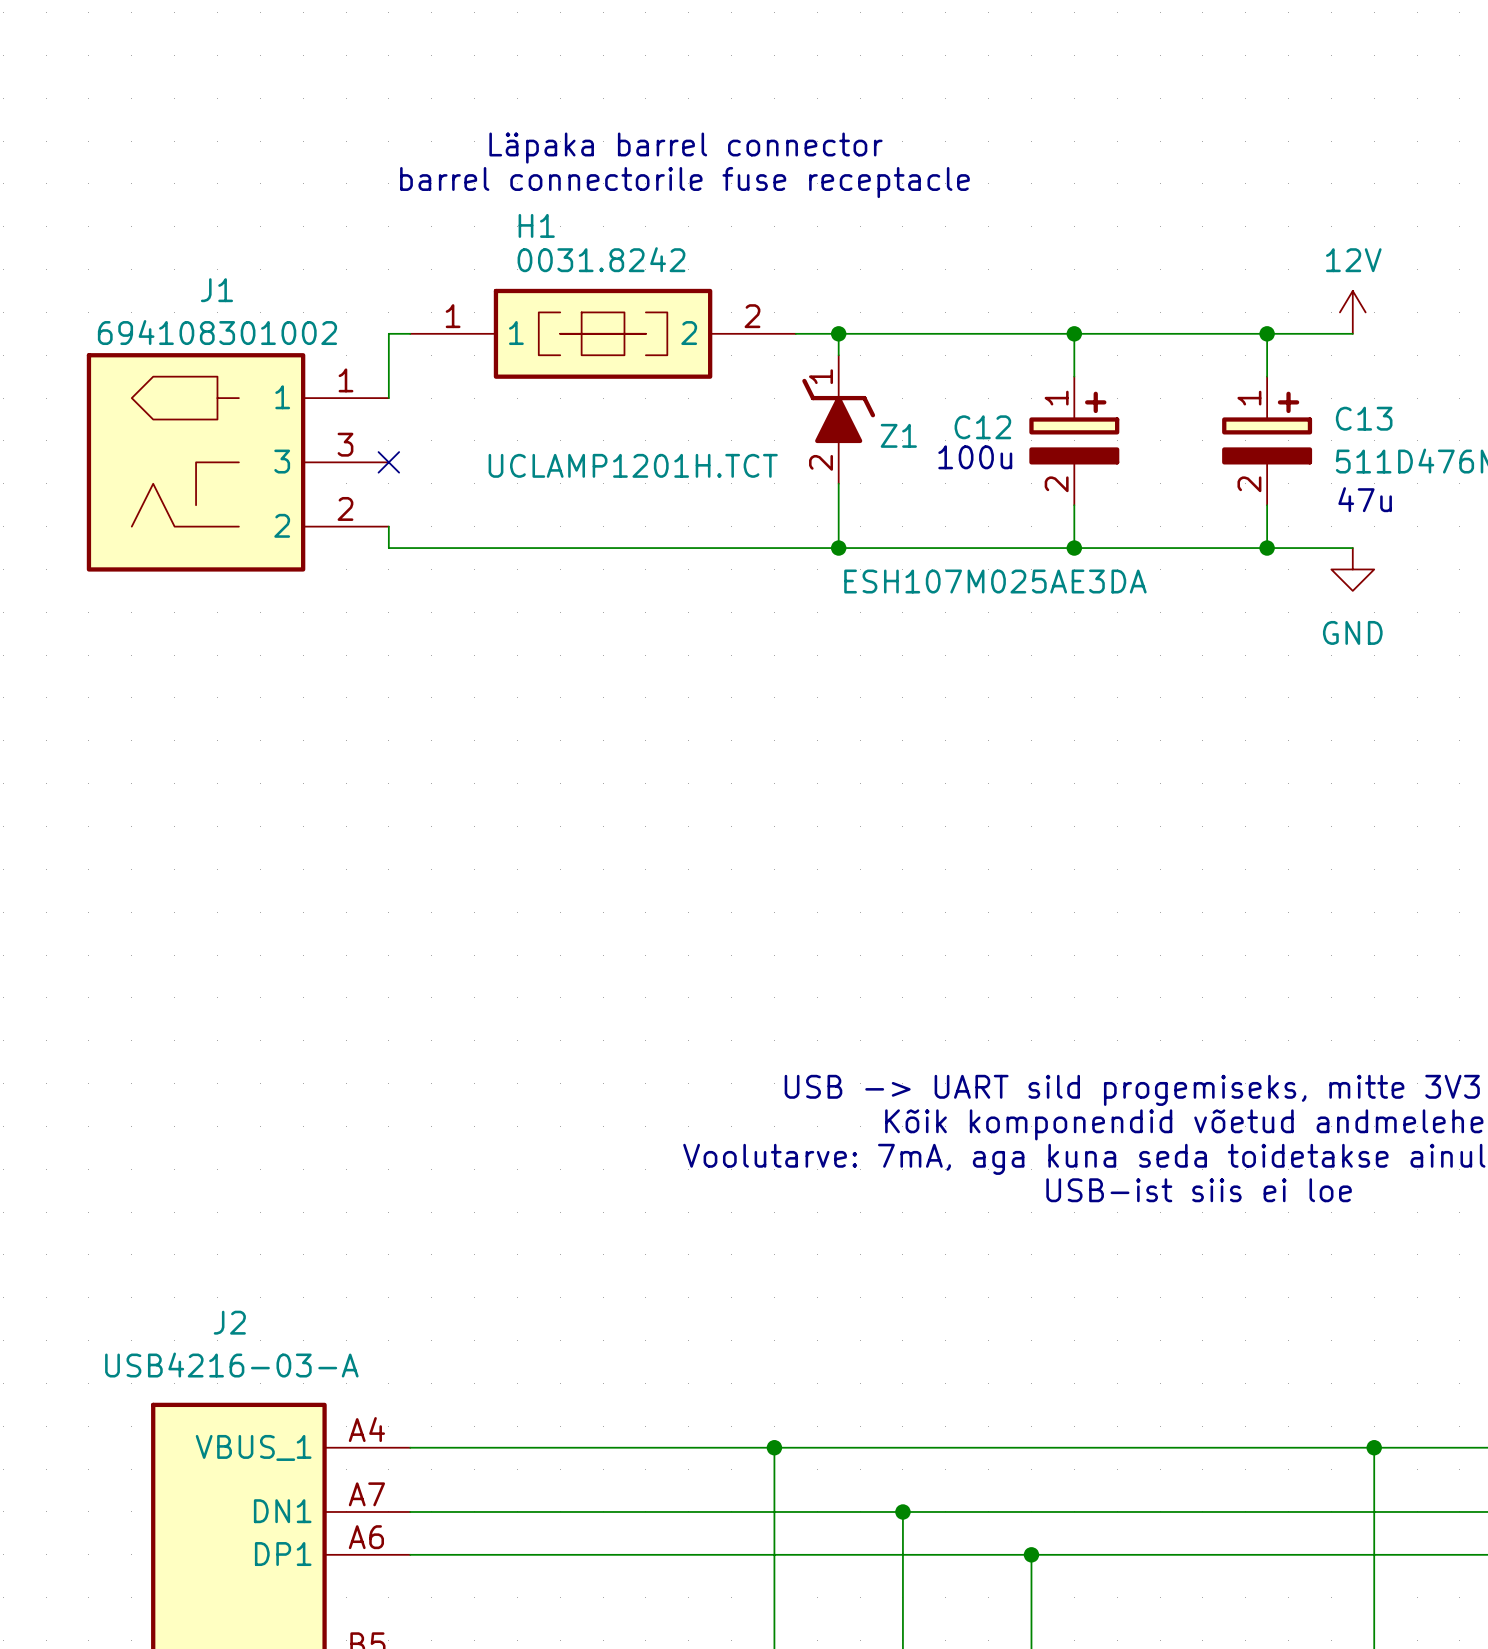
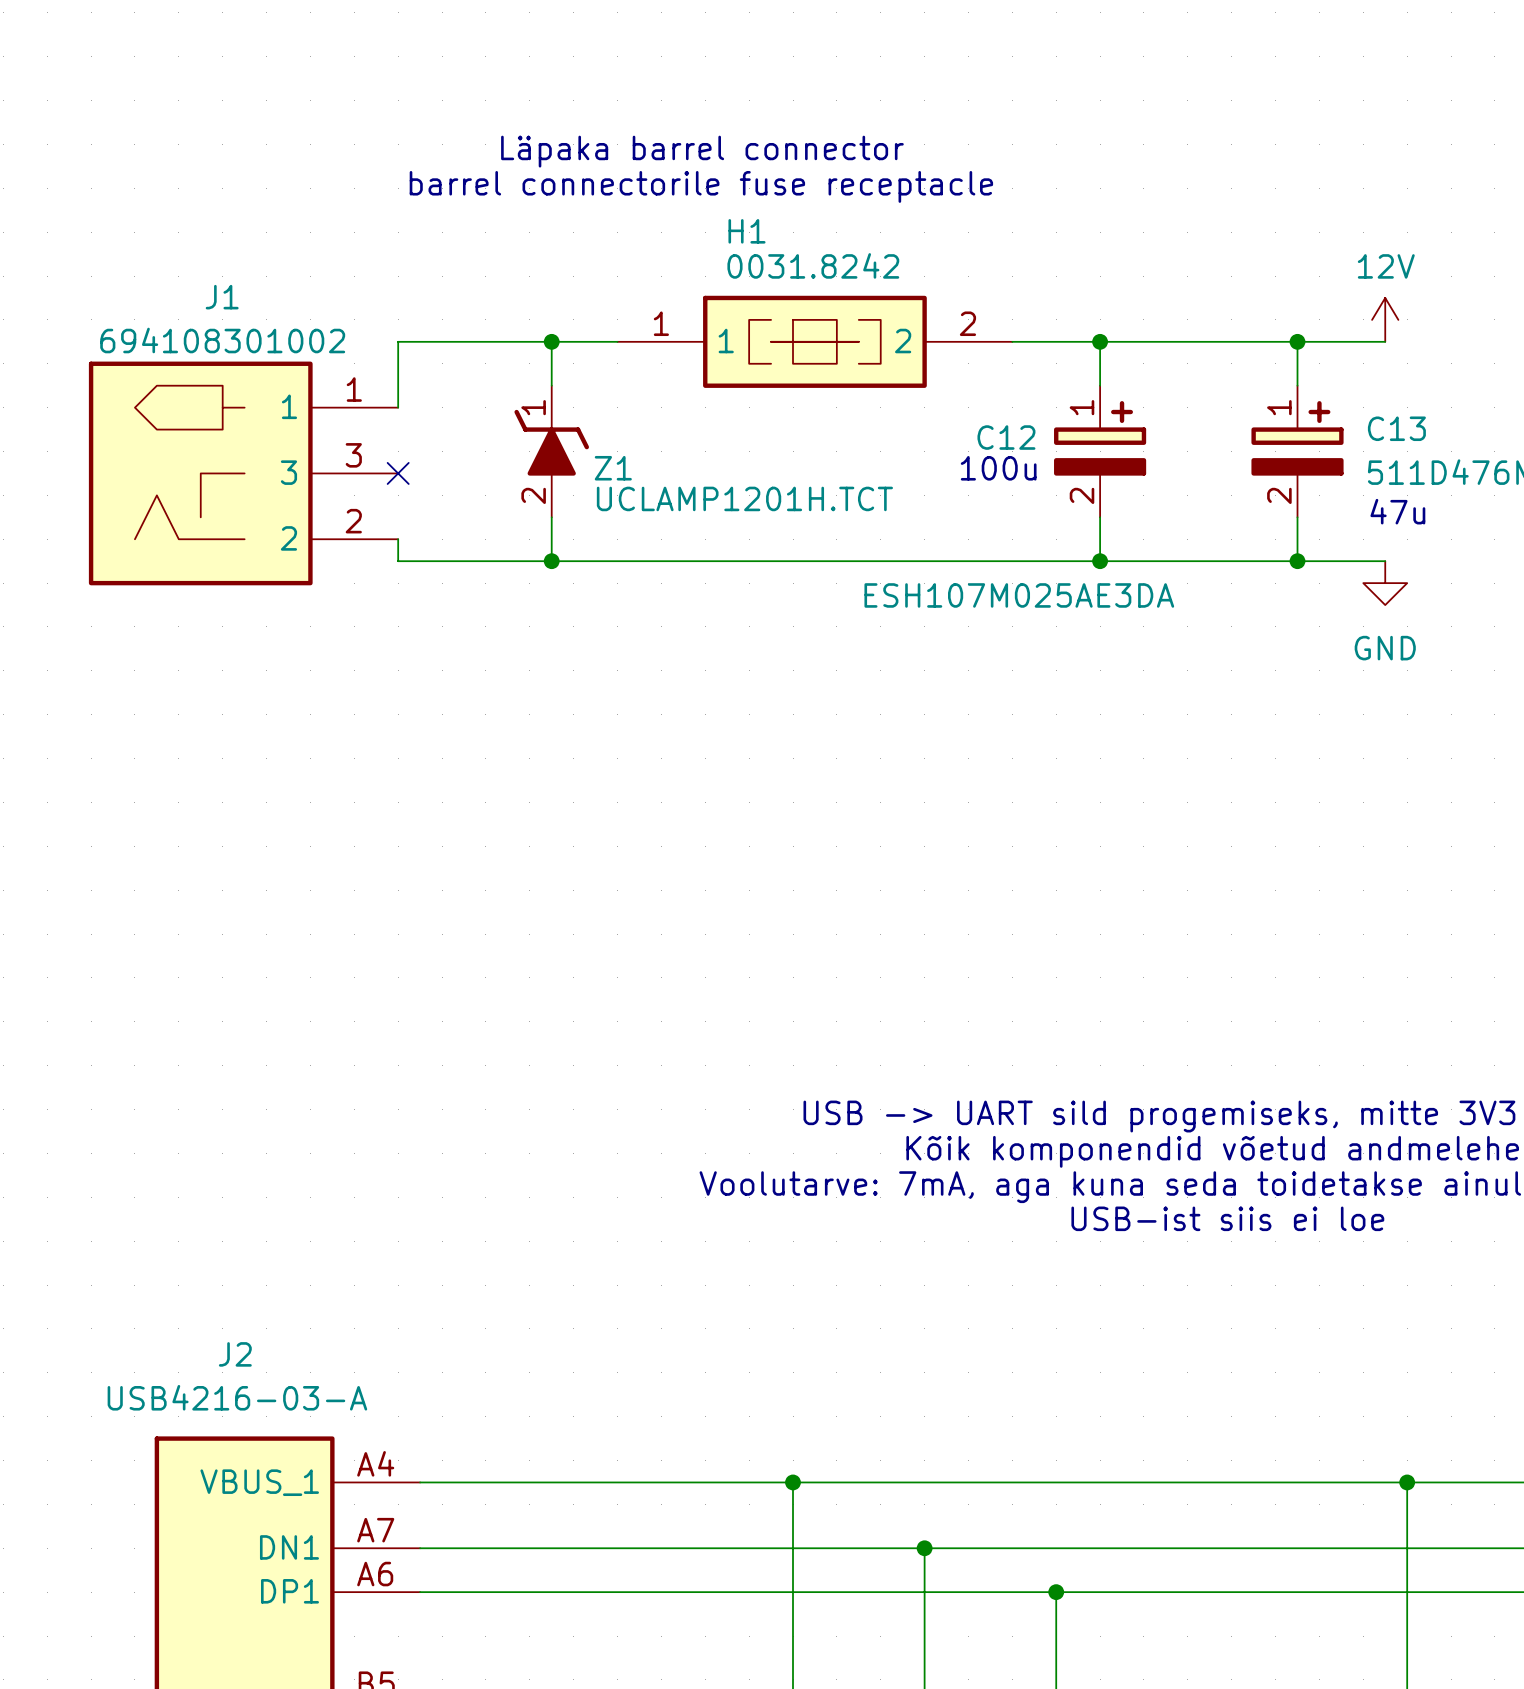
junction: none -> (551, 341)
H1 position: (603, 333) -> (814, 341)
junction: (838, 333) -> none
Z1 position: (838, 419) -> (551, 451)
Z1 value position: UCLAMP1201H.TCT (633, 465) -> UCLAMP1201H.TCT (744, 498)
wire: (838, 483) (838, 548) -> none
wire: none -> (551, 517) (551, 561)
junction: none -> (551, 561)
junction: (838, 548) -> none

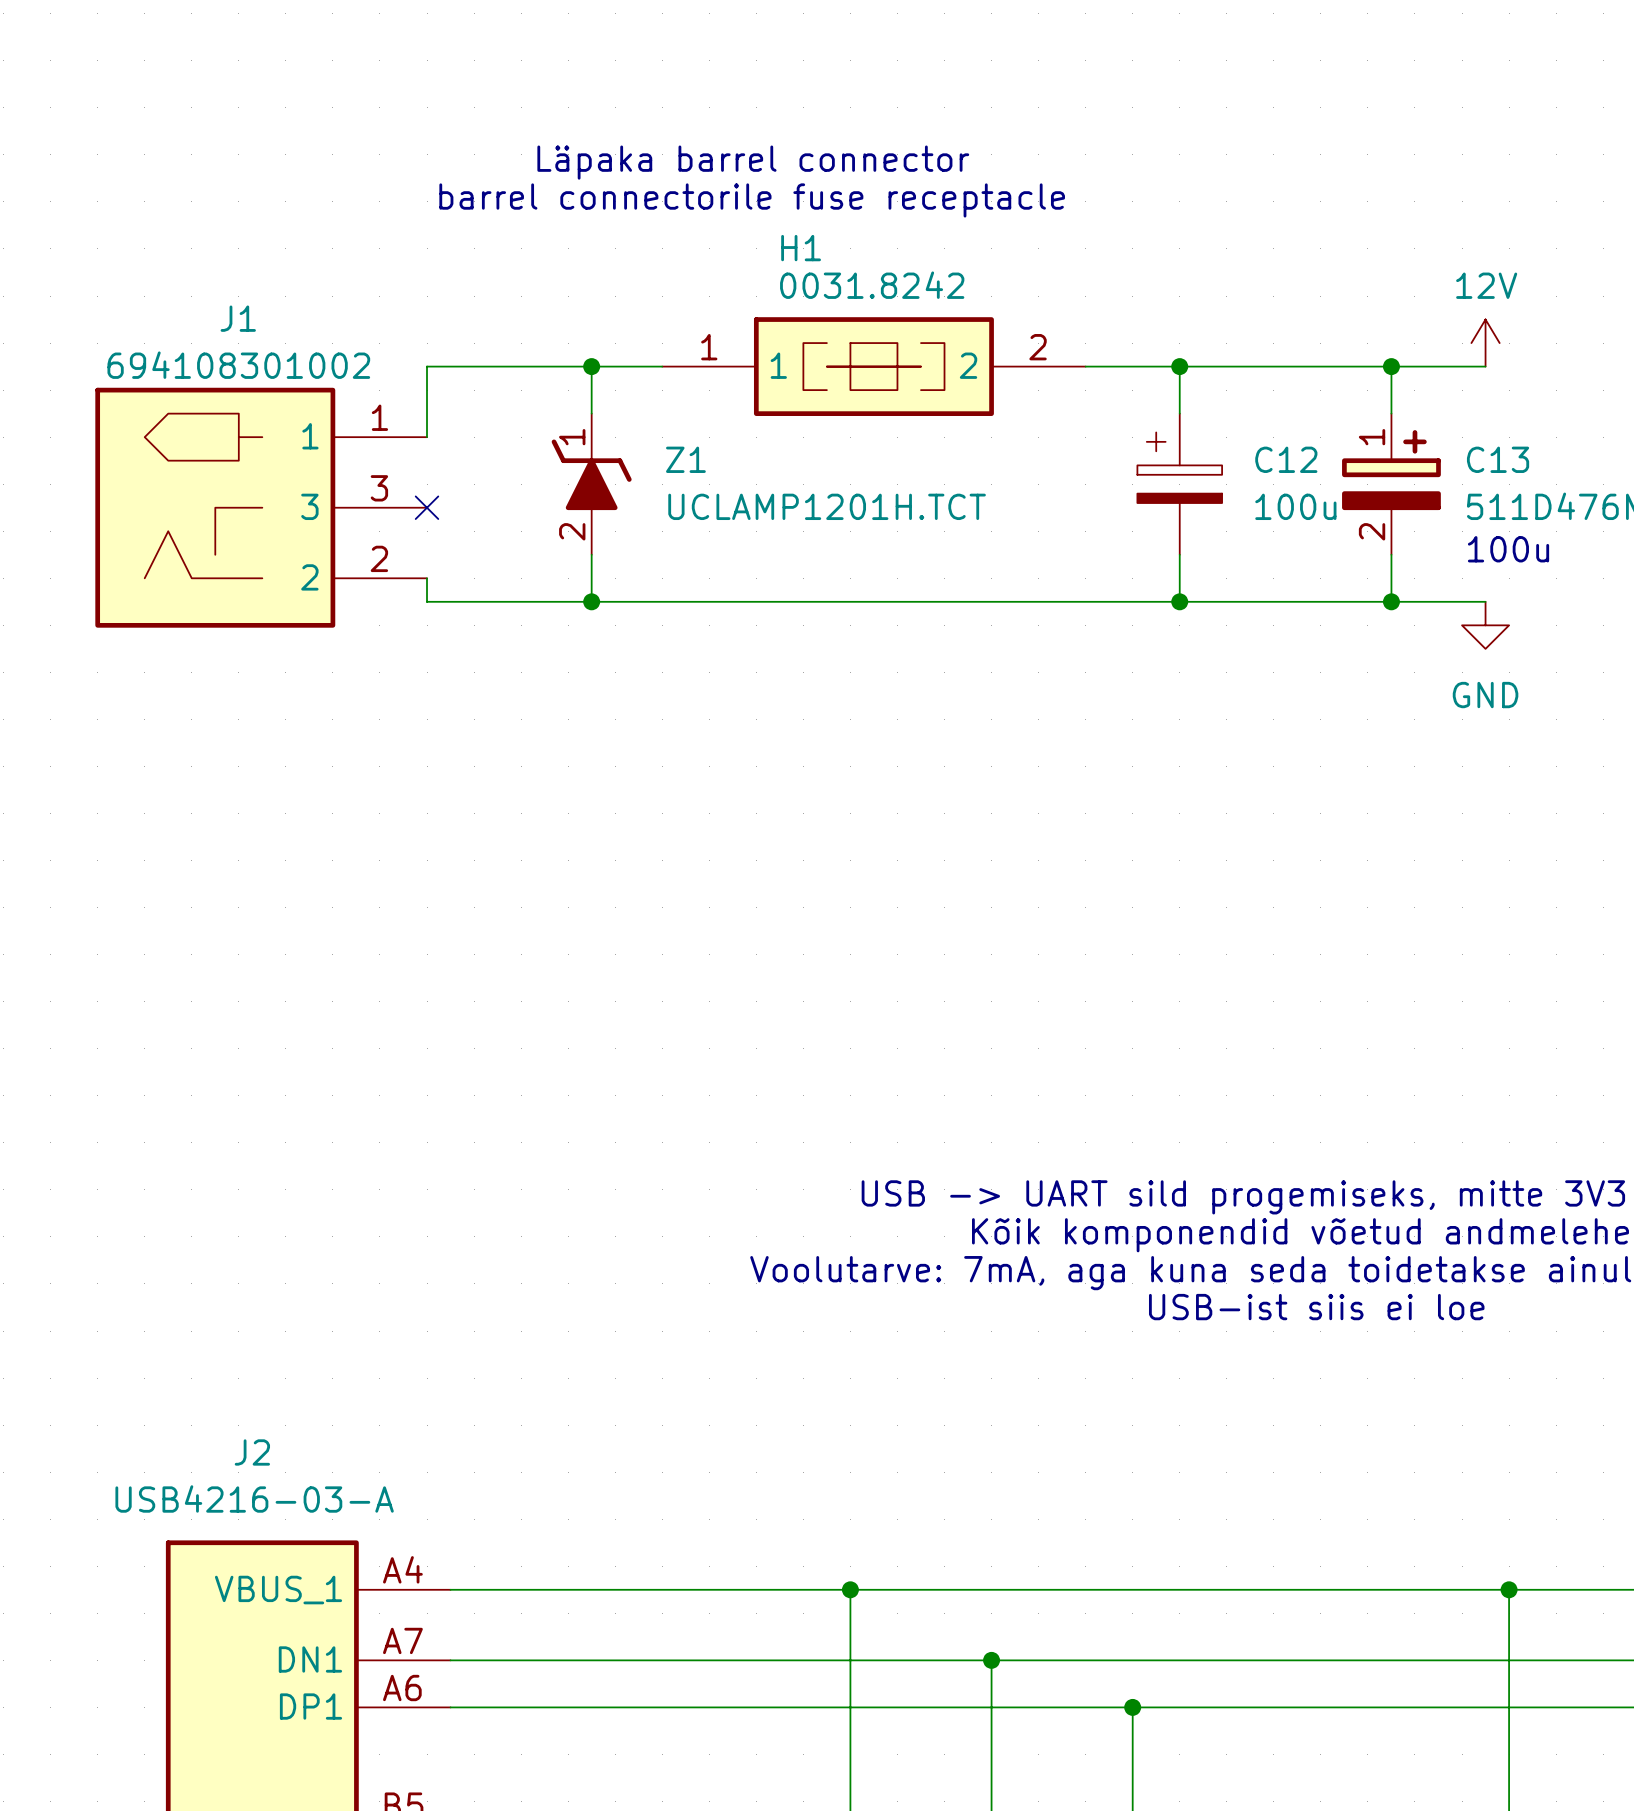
C12 symbol: [1054, 385, 1147, 518] -> [1137, 413, 1223, 555]
C12 name position: C12 (1006, 437) -> C12 (1286, 459)
Z1 name position: Z1 (613, 468) -> Z1 (685, 459)
text: 100u (998, 468) -> none
Z1 value position: UCLAMP1201H.TCT (744, 498) -> UCLAMP1201H.TCT (827, 506)
text: 47u (1397, 511) -> 100u (1508, 549)
C12 value: ESH107M025AE3DA (1019, 595) -> 100u (1295, 506)

